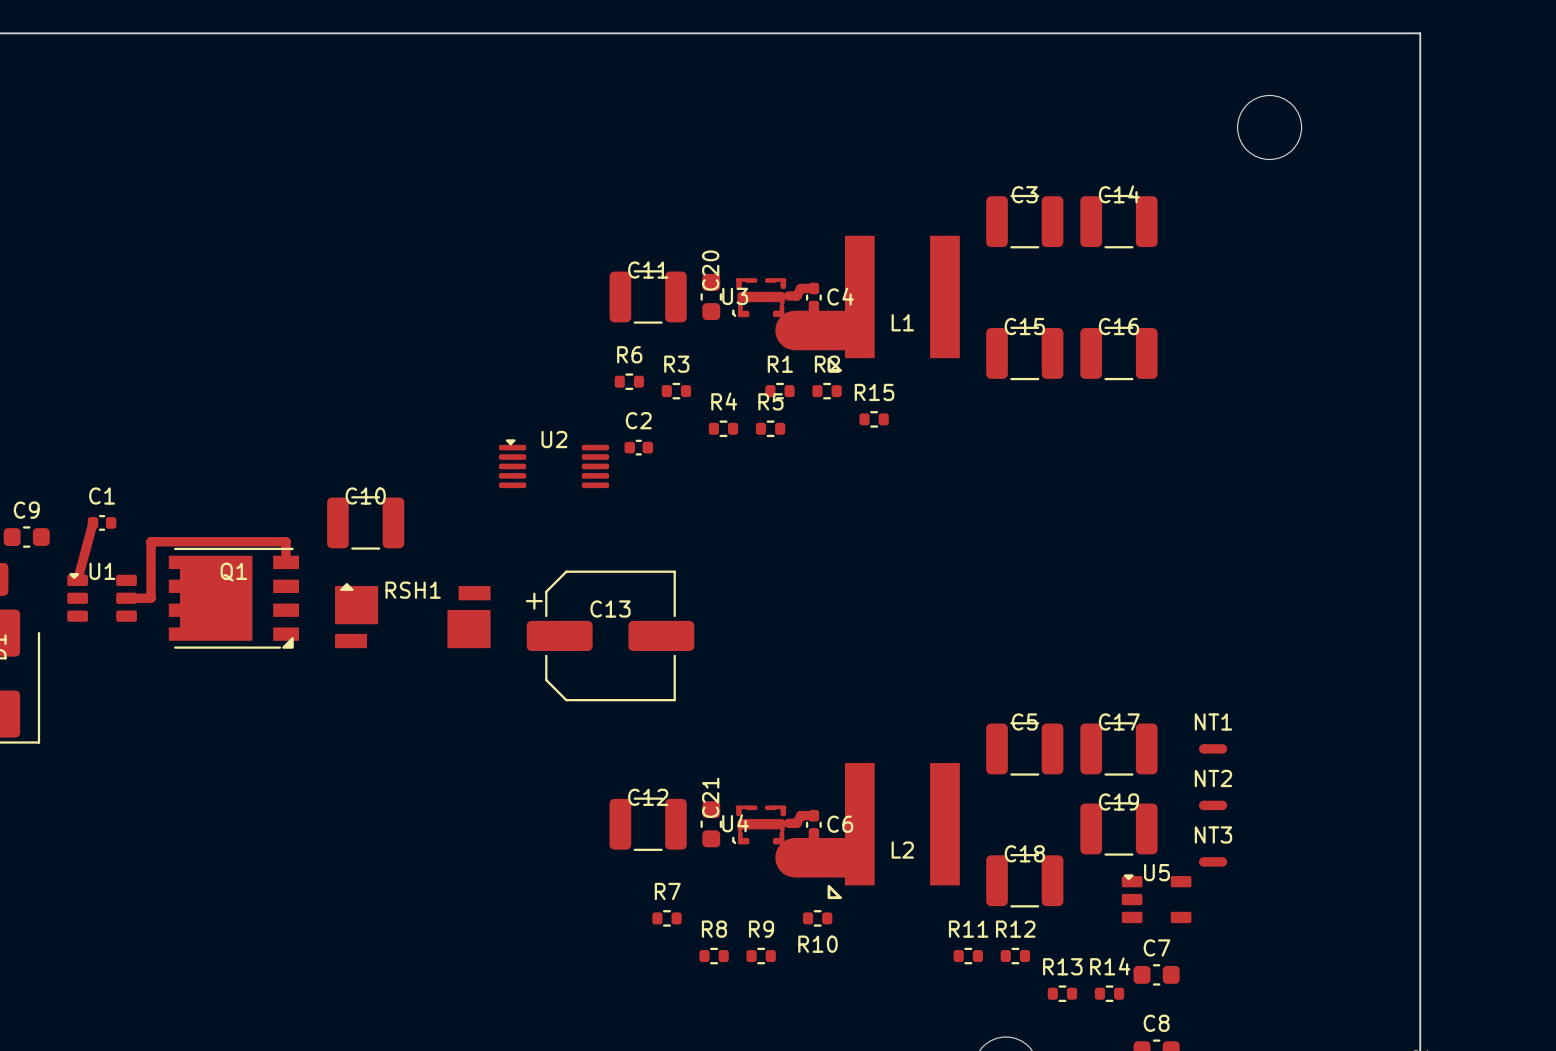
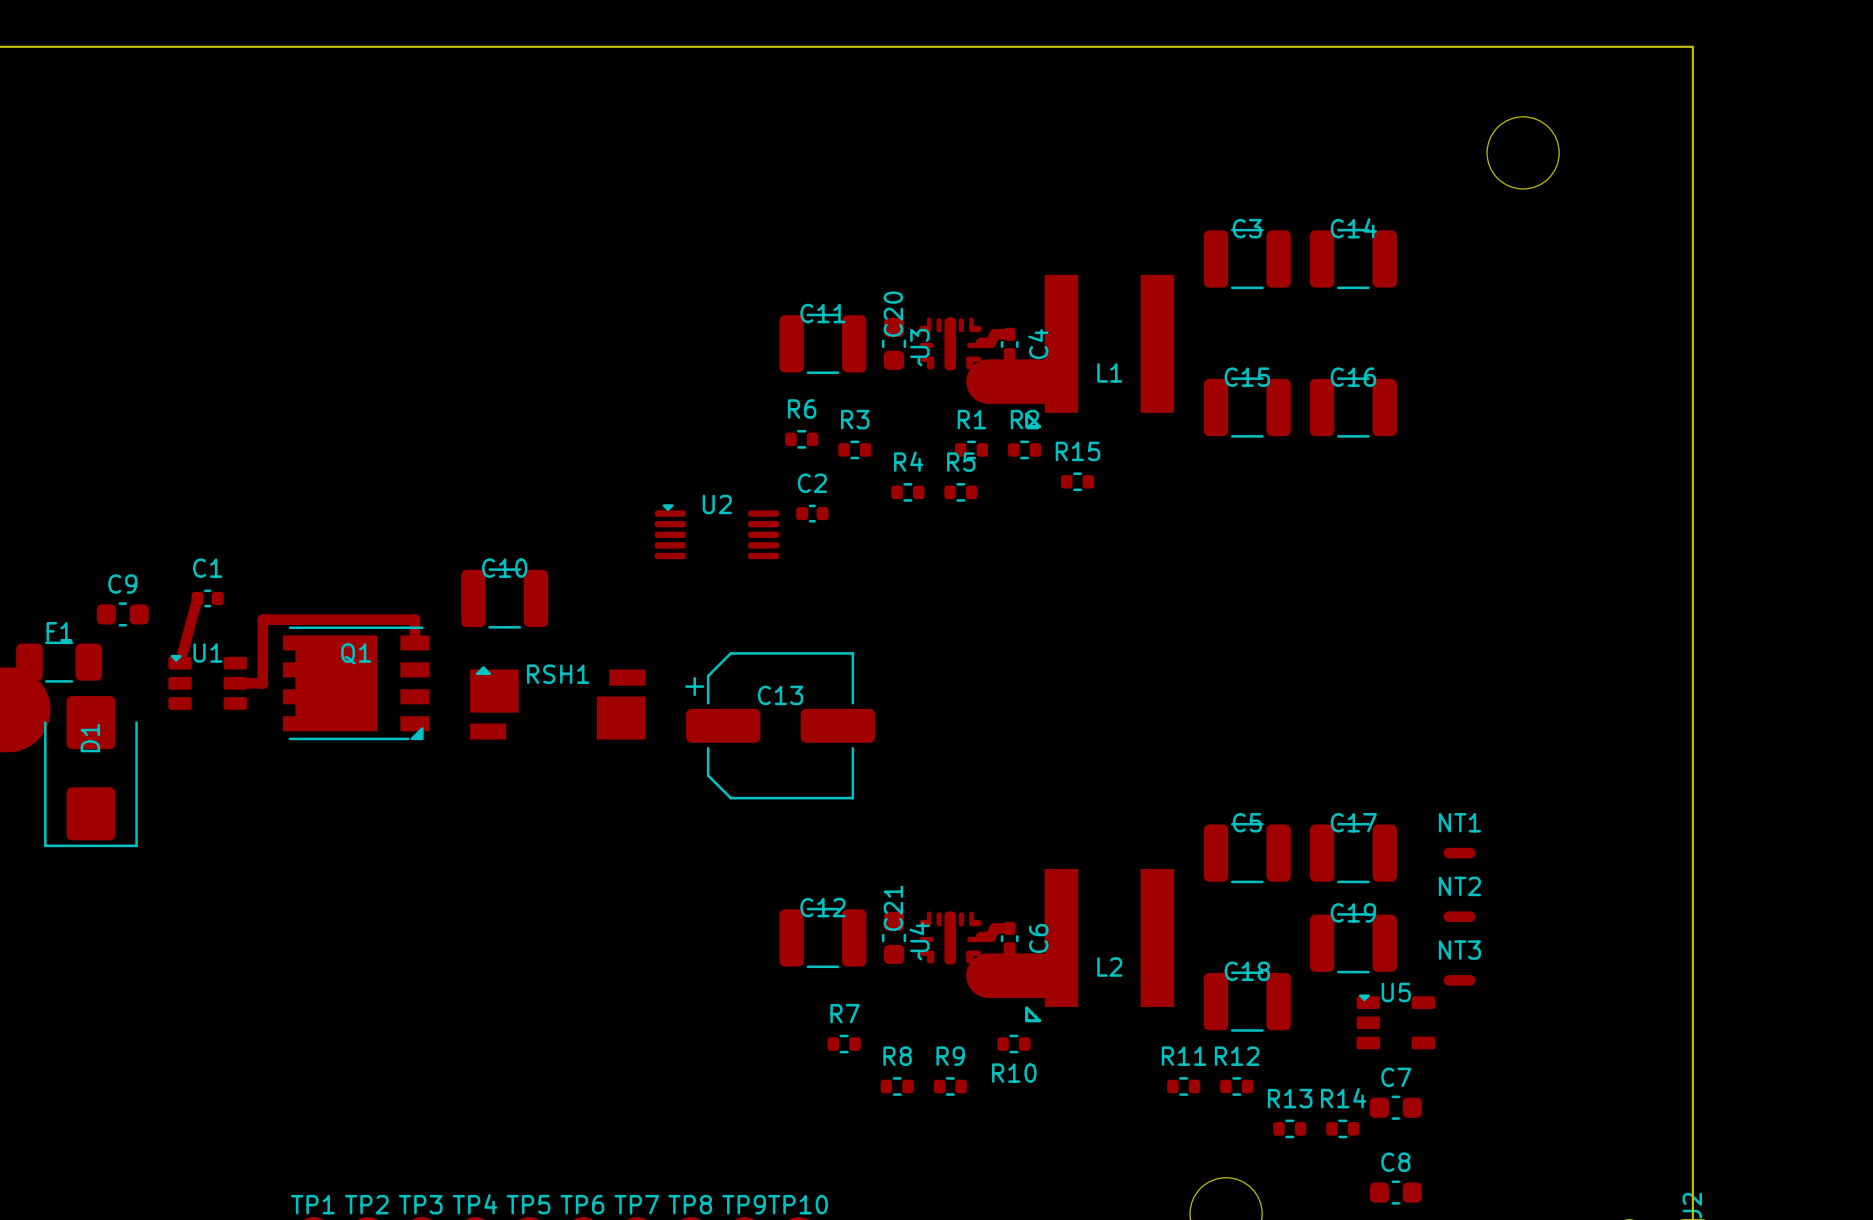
U3 footprint: [732, 278, 787, 318] -> [917, 317, 982, 371]
U3 name rotation: 0° (735, 296) -> 90° counterclockwise (919, 343)
C4 name rotation: 0° (840, 296) -> 90° counterclockwise (1038, 344)
U4 footprint: [732, 805, 787, 845] -> [917, 911, 982, 965]
U4 name rotation: 0° (735, 823) -> 90° counterclockwise (919, 937)
C6 name rotation: 0° (840, 824) -> 90° counterclockwise (1038, 938)

